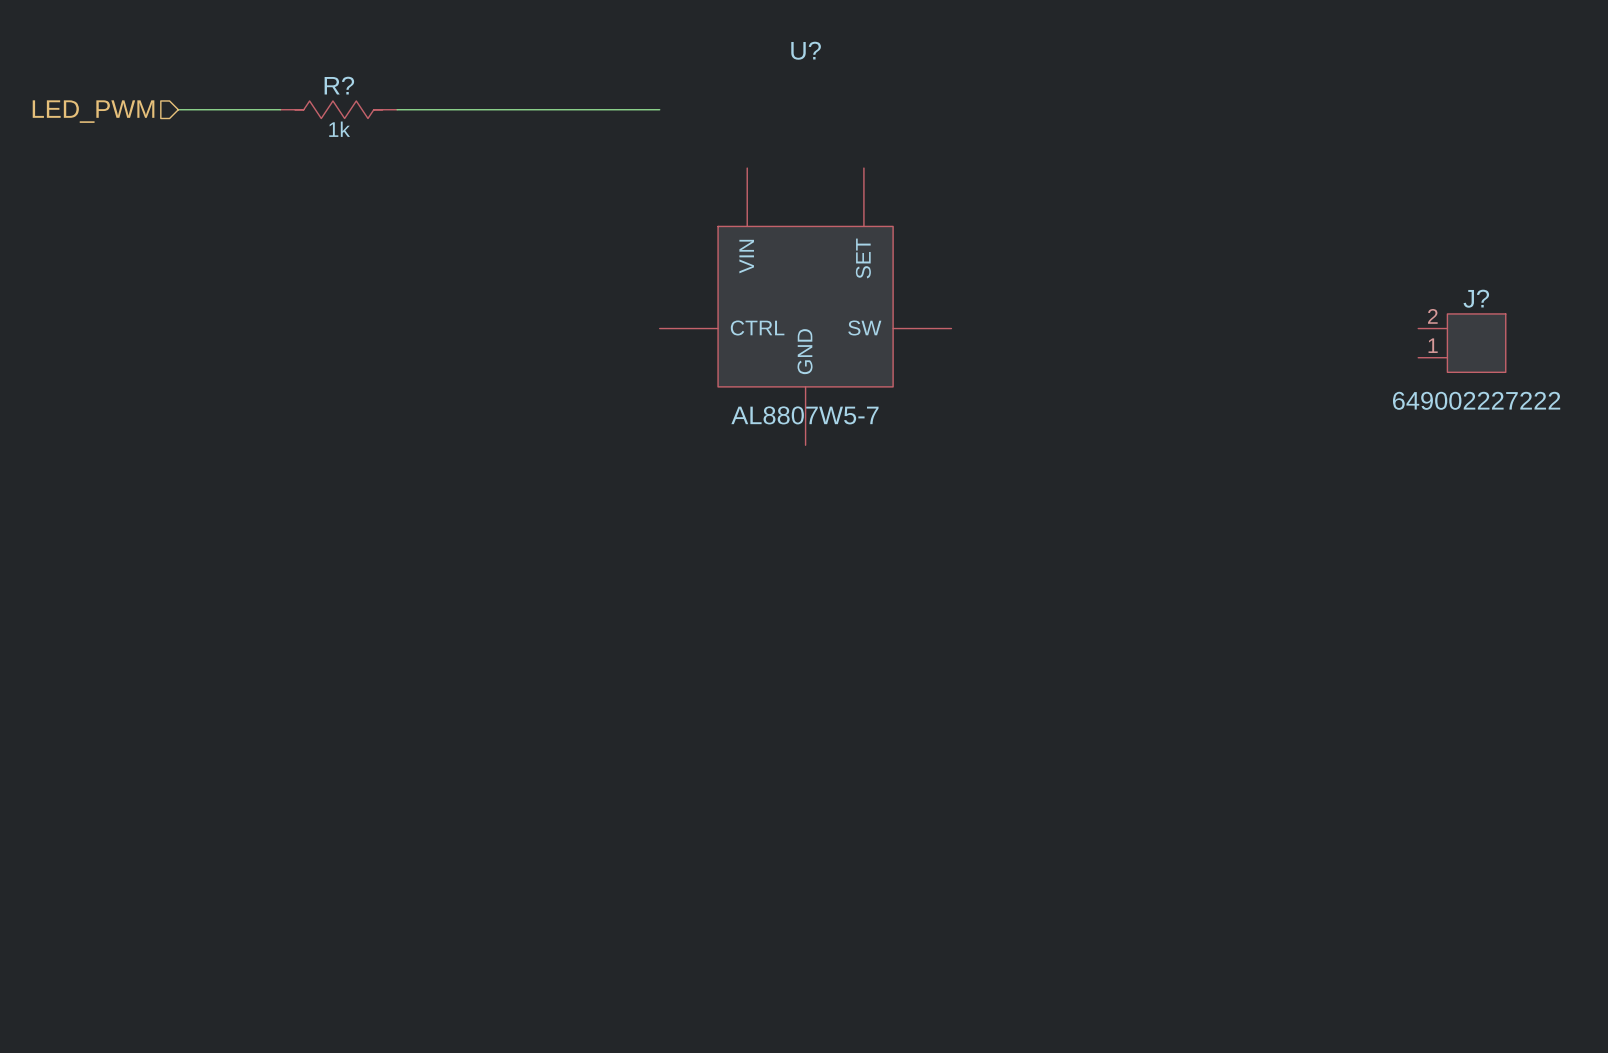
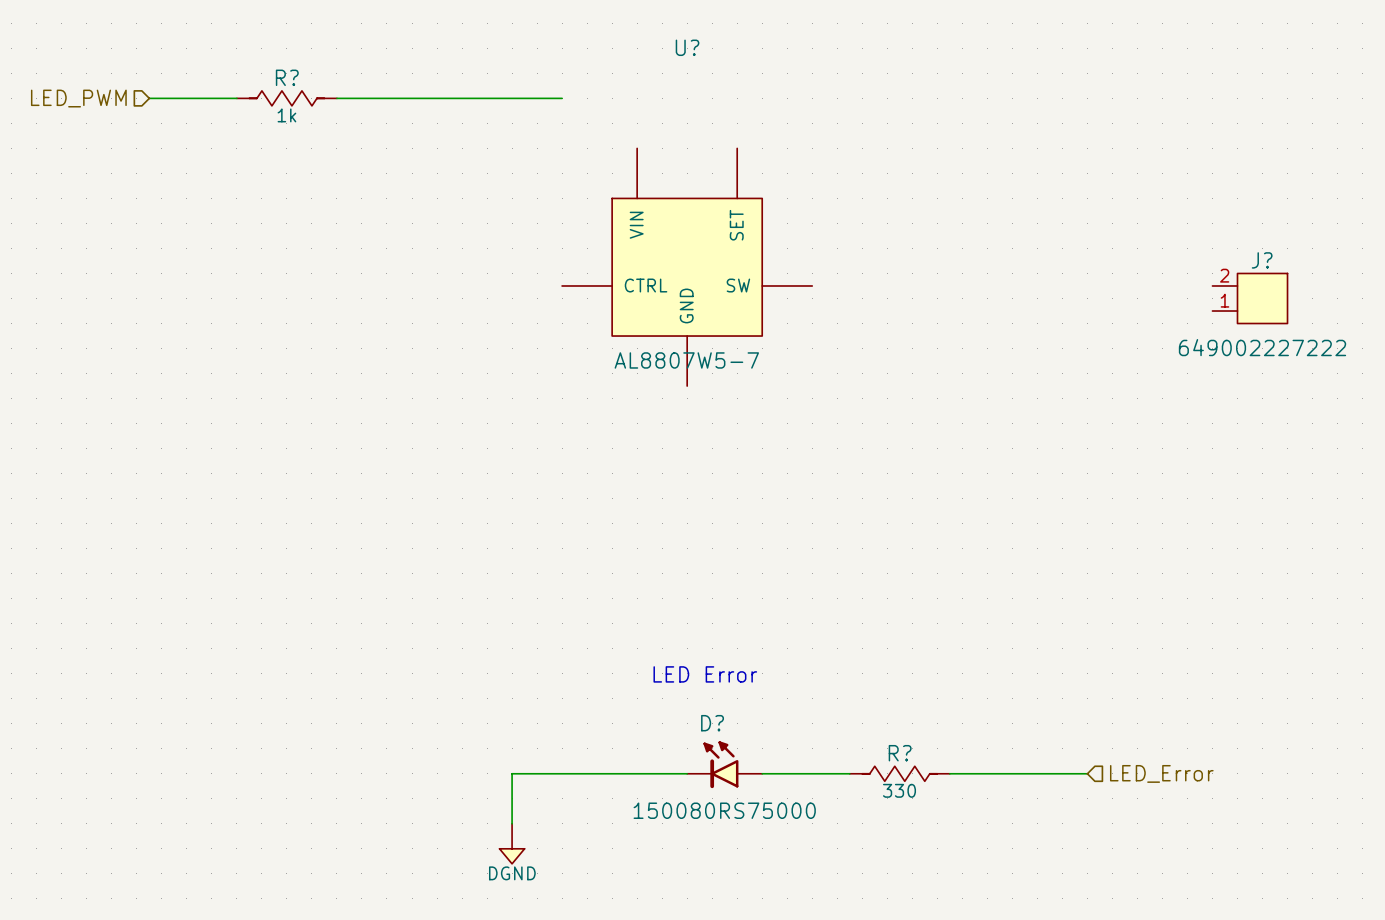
text: none -> LED Error (705, 674)
D?: none -> 150080RS75000 (724, 764)
wire: none -> (687, 773) (512, 773) (512, 823)
wire: none -> (762, 773) (849, 773)
R?: none -> (899, 773)
wire: none -> (949, 773) (1087, 773)
hierarchical label: none -> LED_Error (1161, 773)
power symbol: none -> DGND (512, 843)

